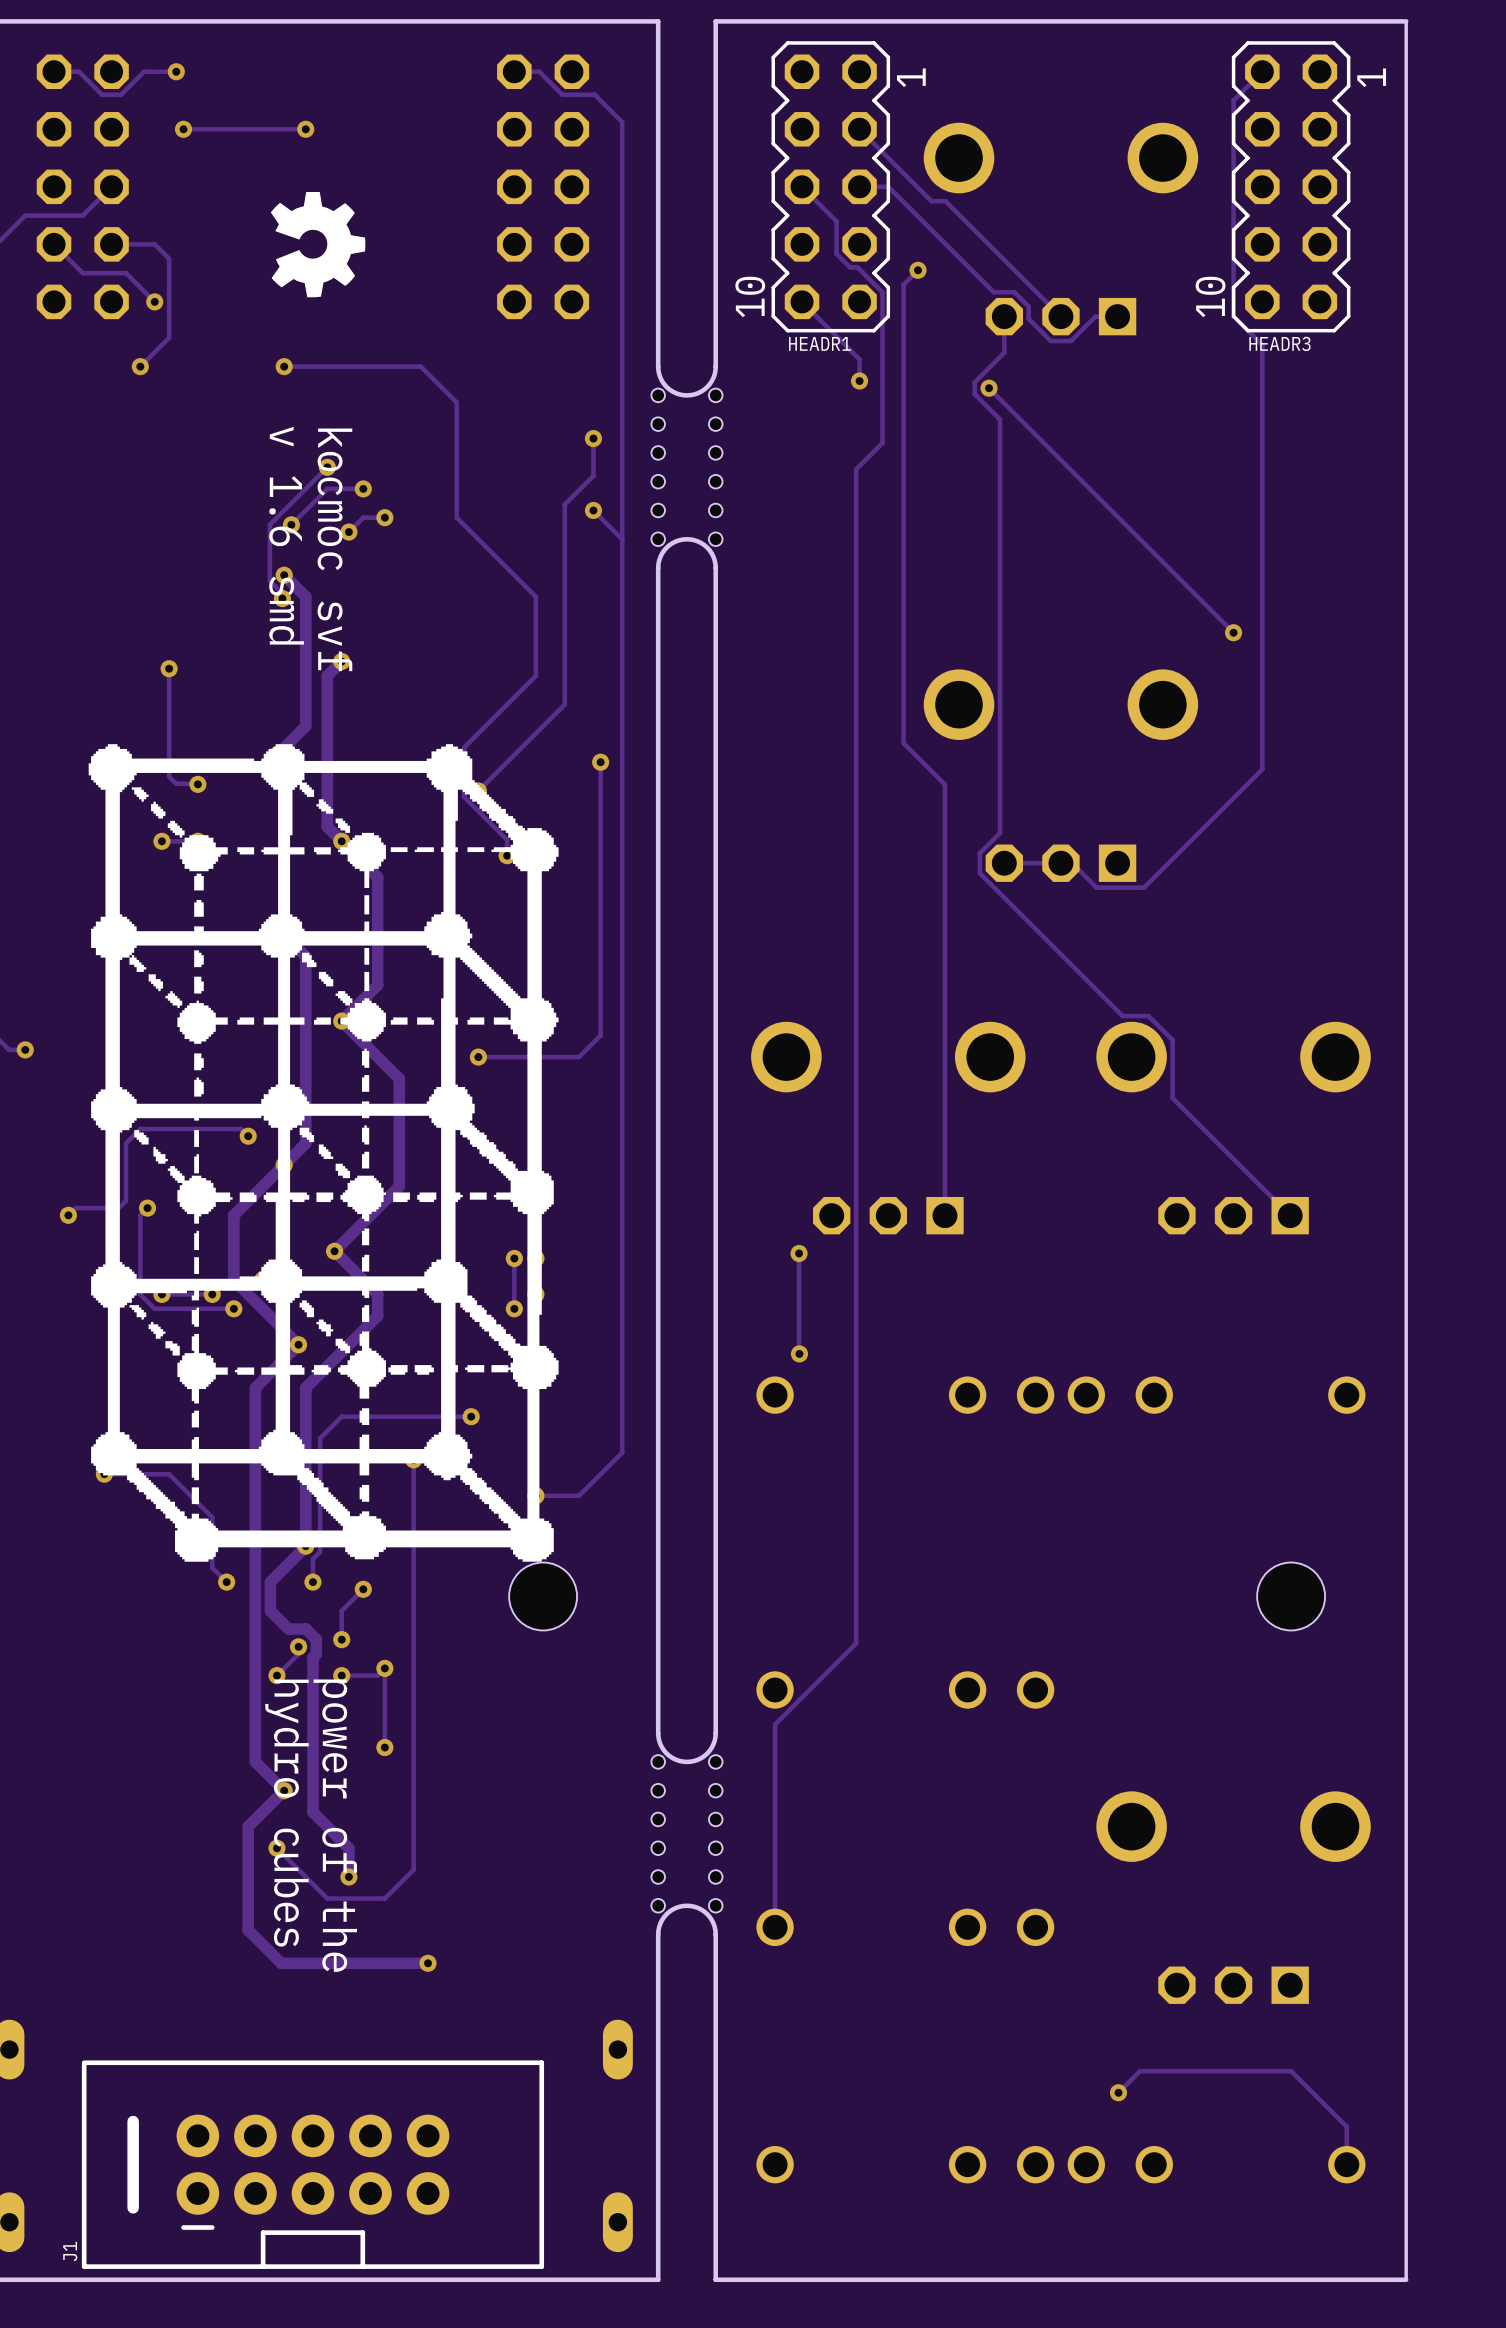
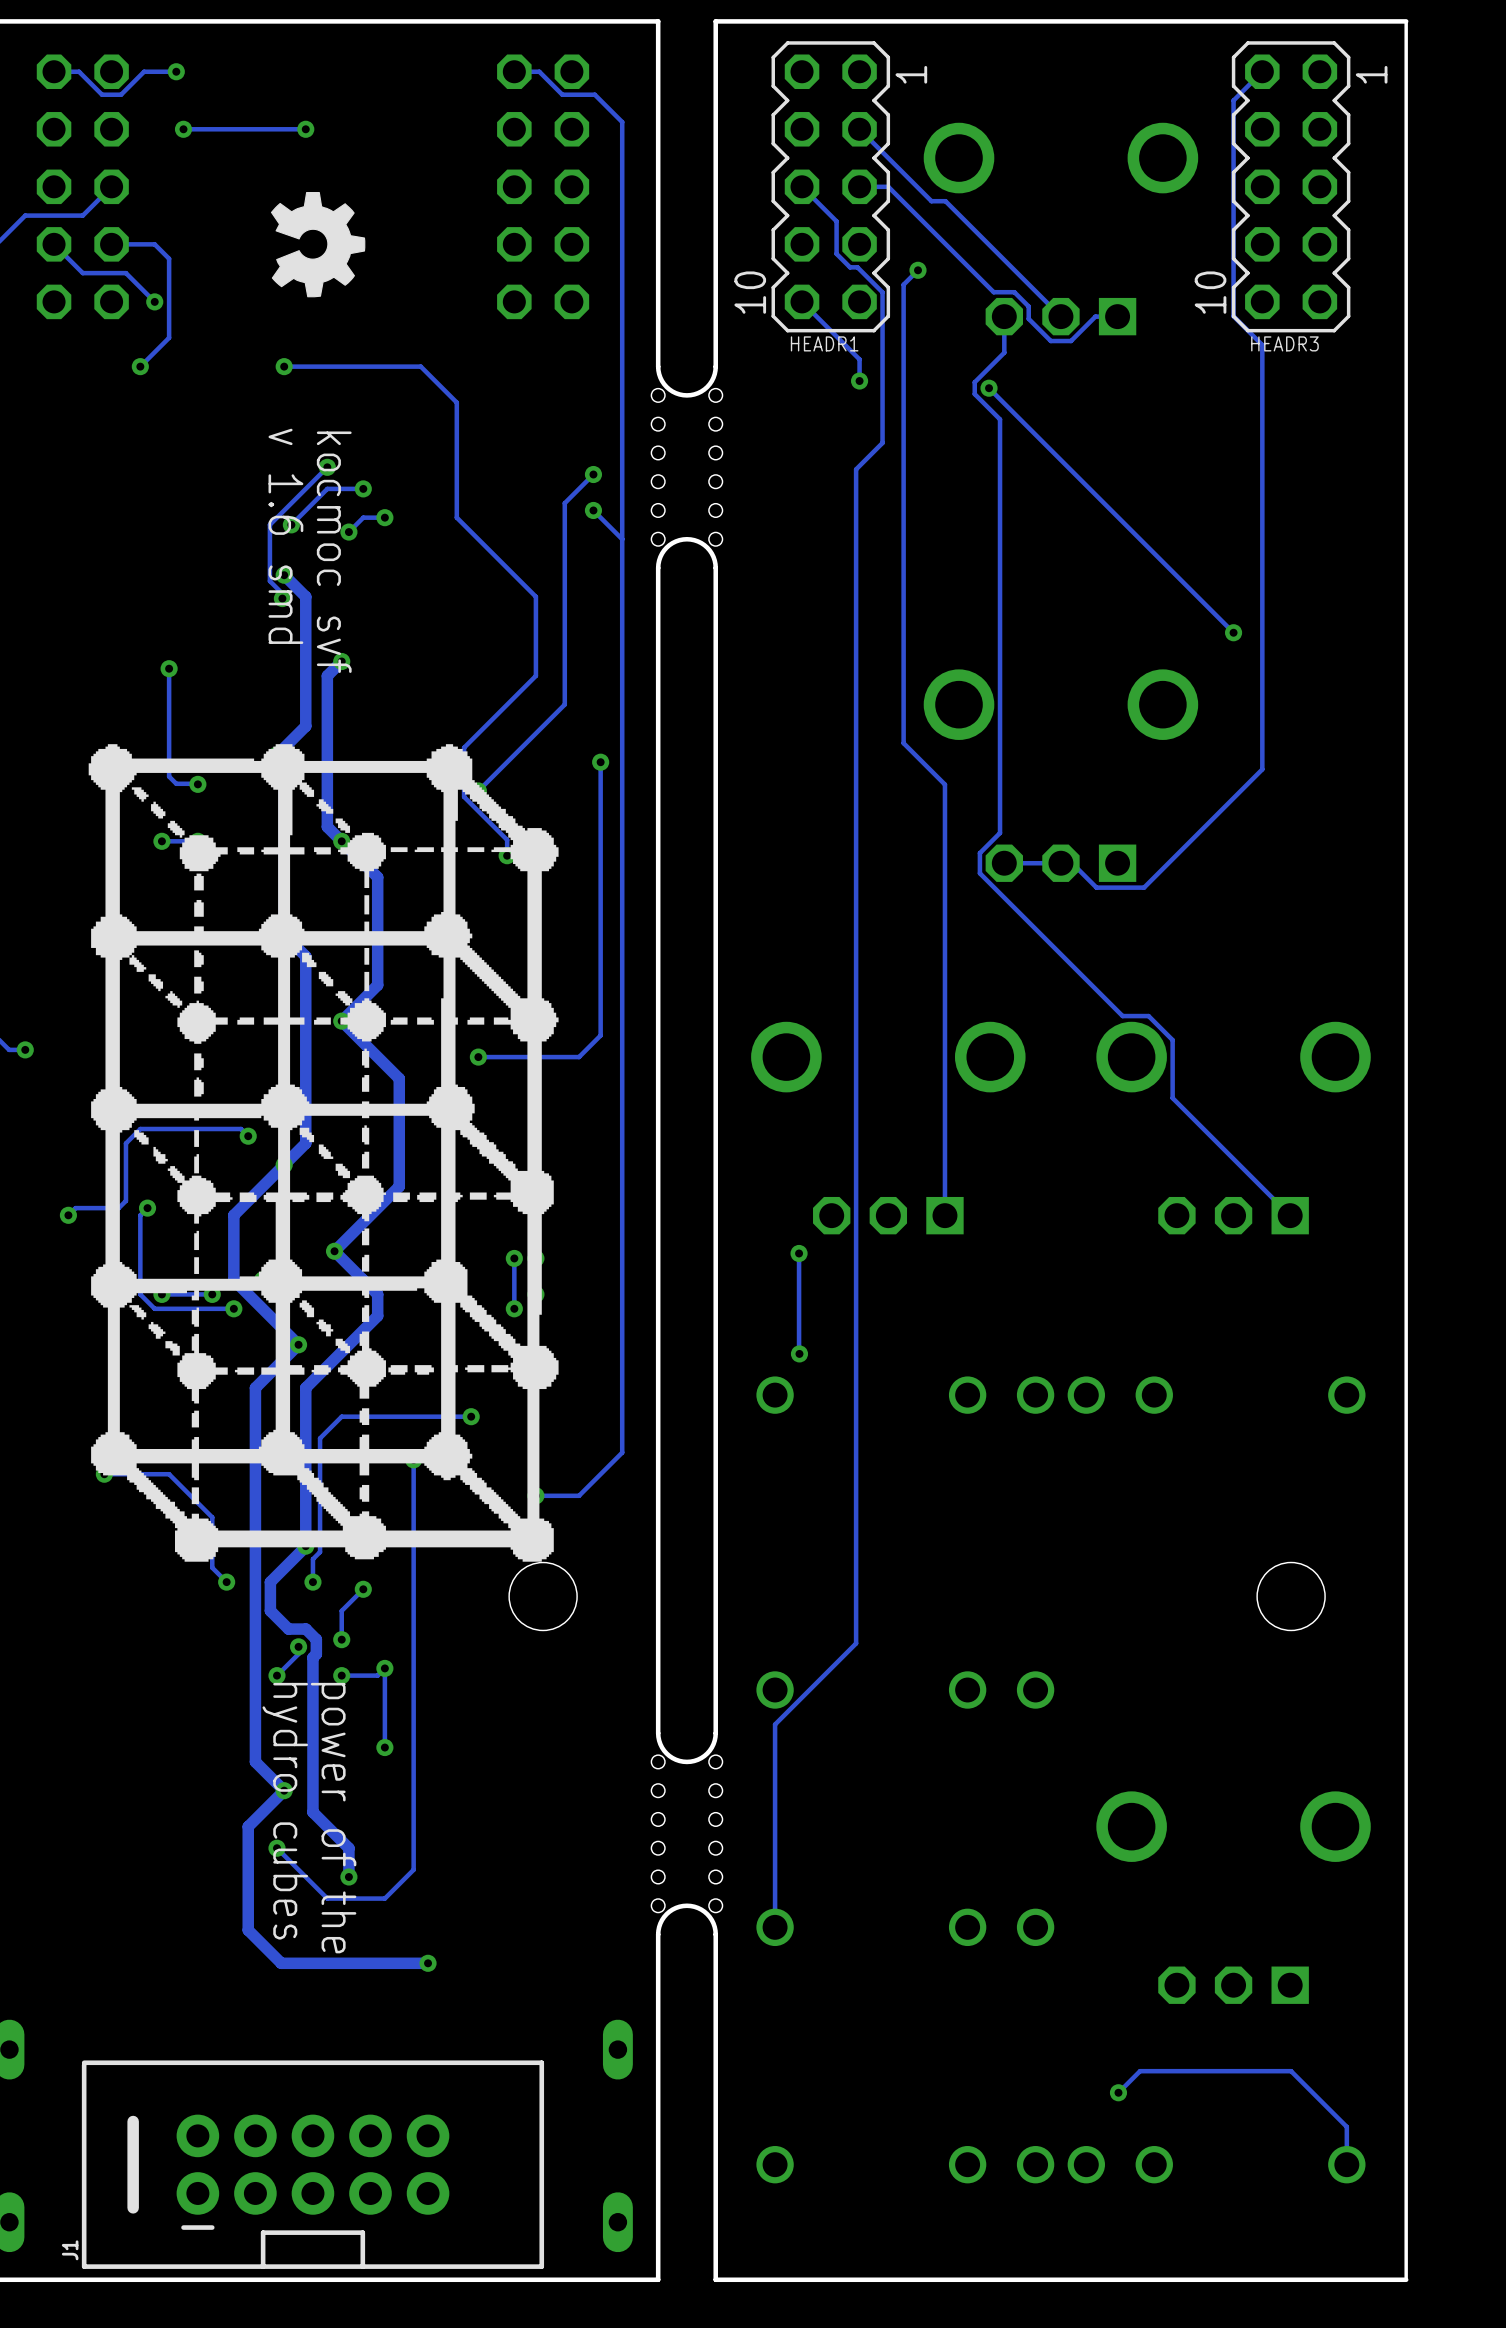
track: (593, 438) (593, 475) (564, 504) -> (593, 474) (564, 504)
via position: (593, 438) -> (593, 474)

